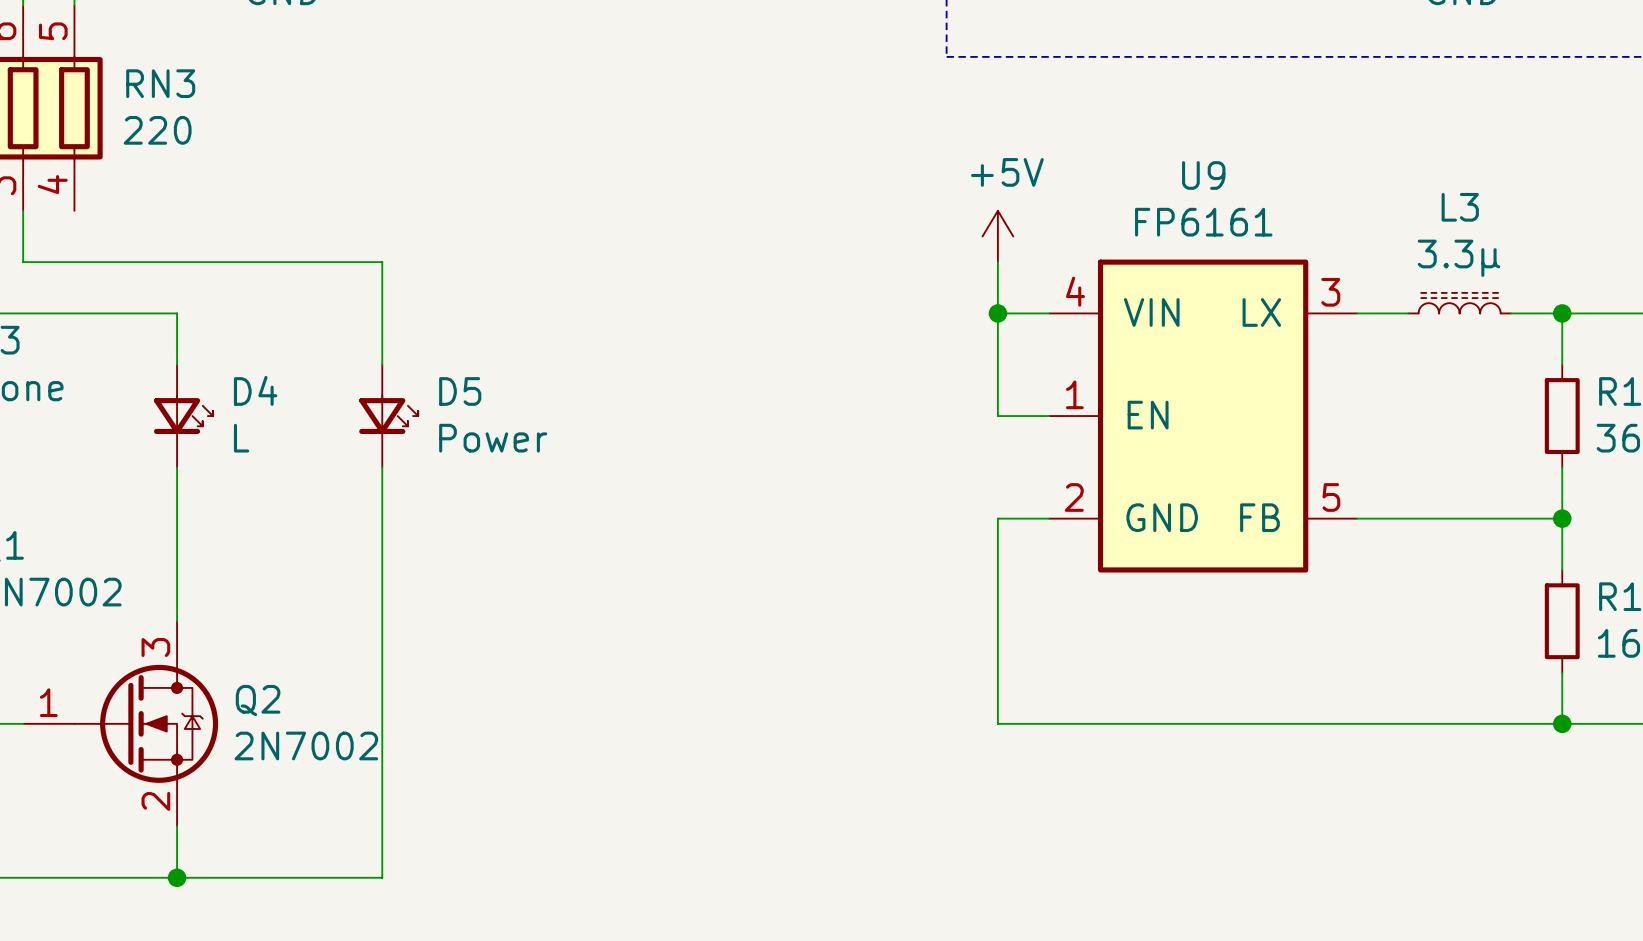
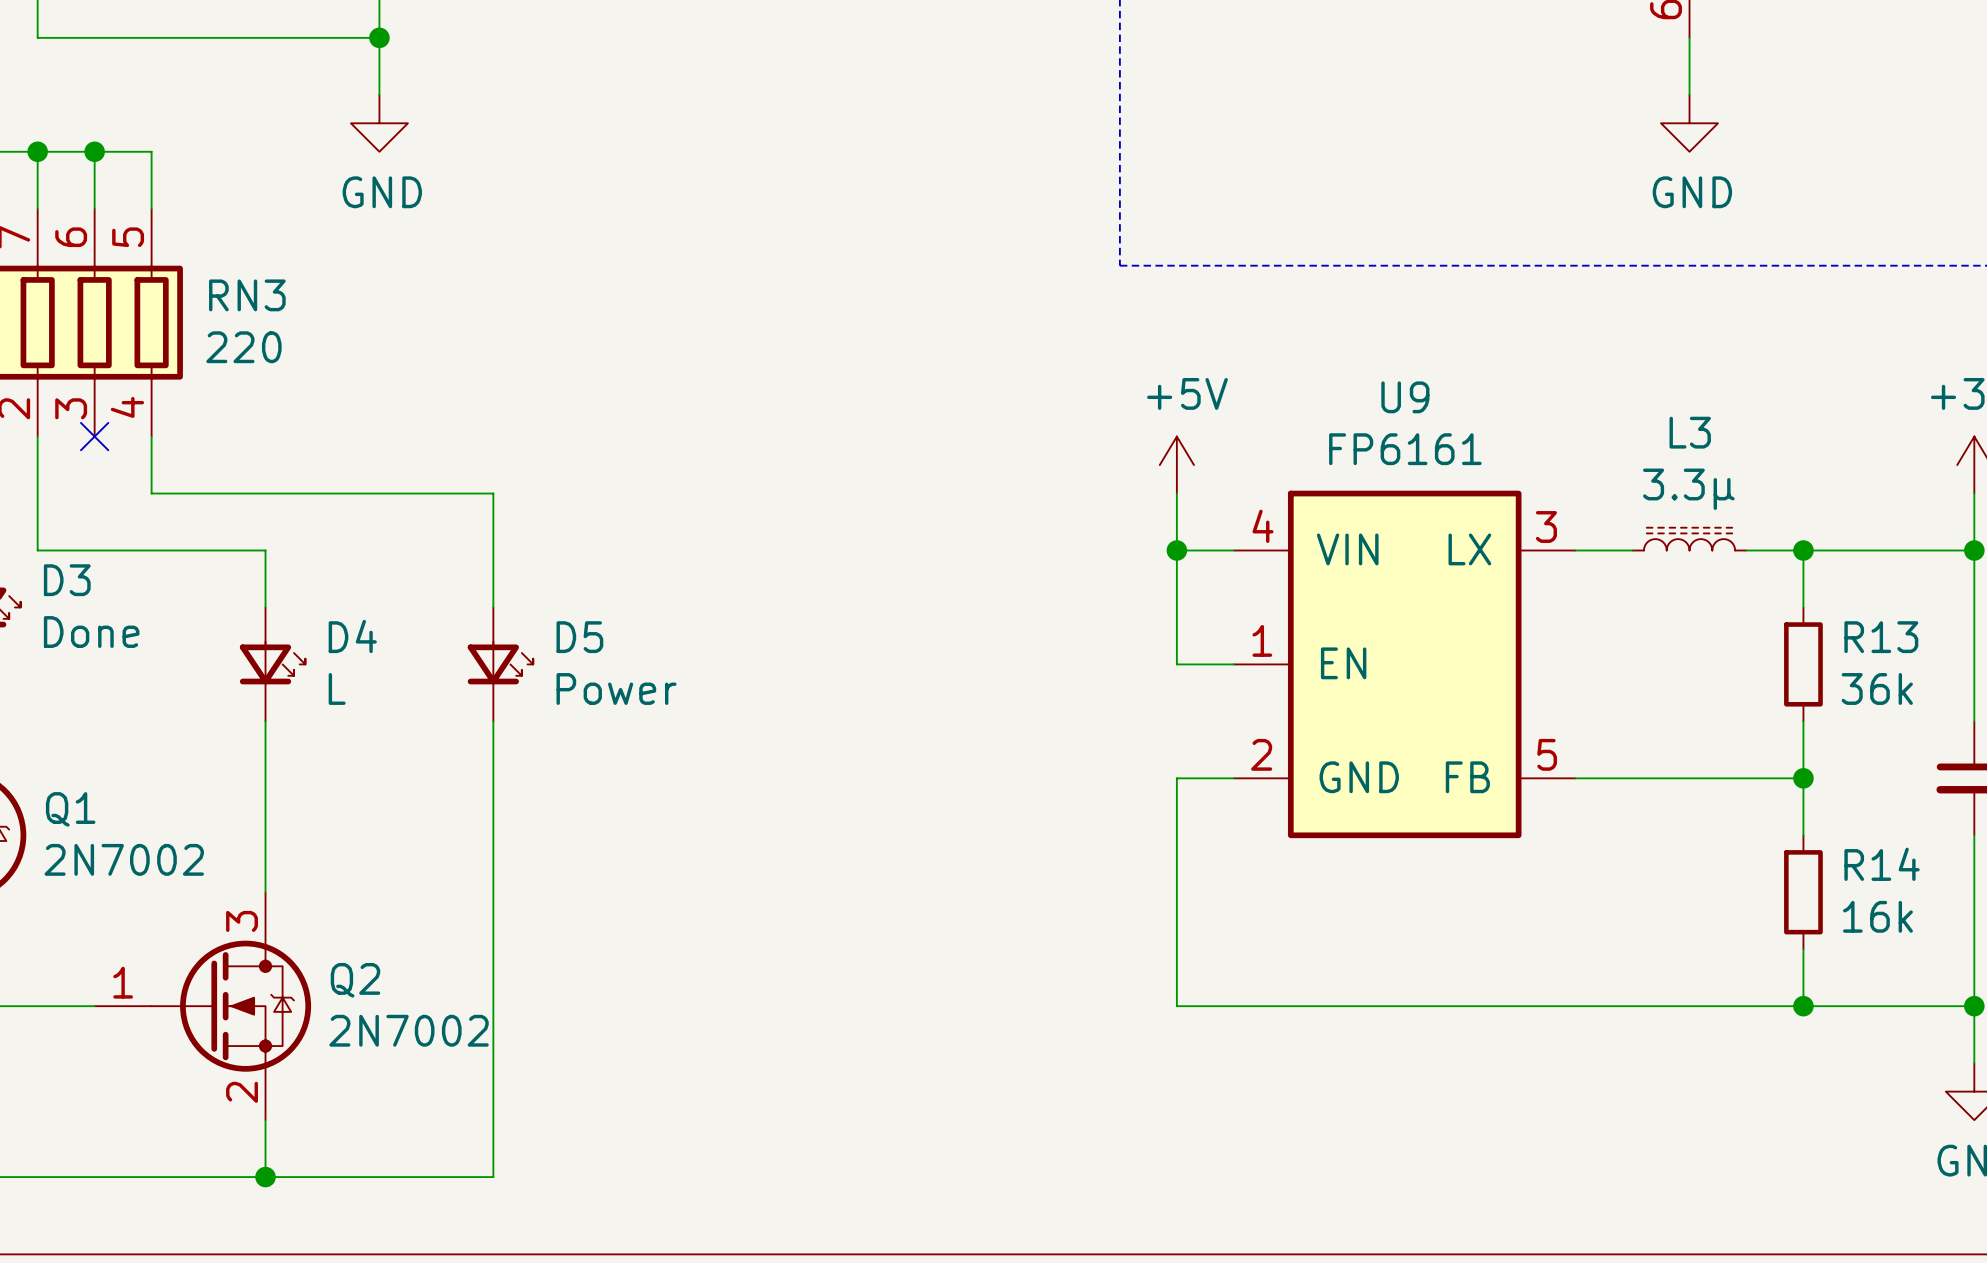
wire: (23, 210) (23, 262) (74, 262) -> (151, 436) (151, 493)
no-connect mark: none -> (94, 436)

